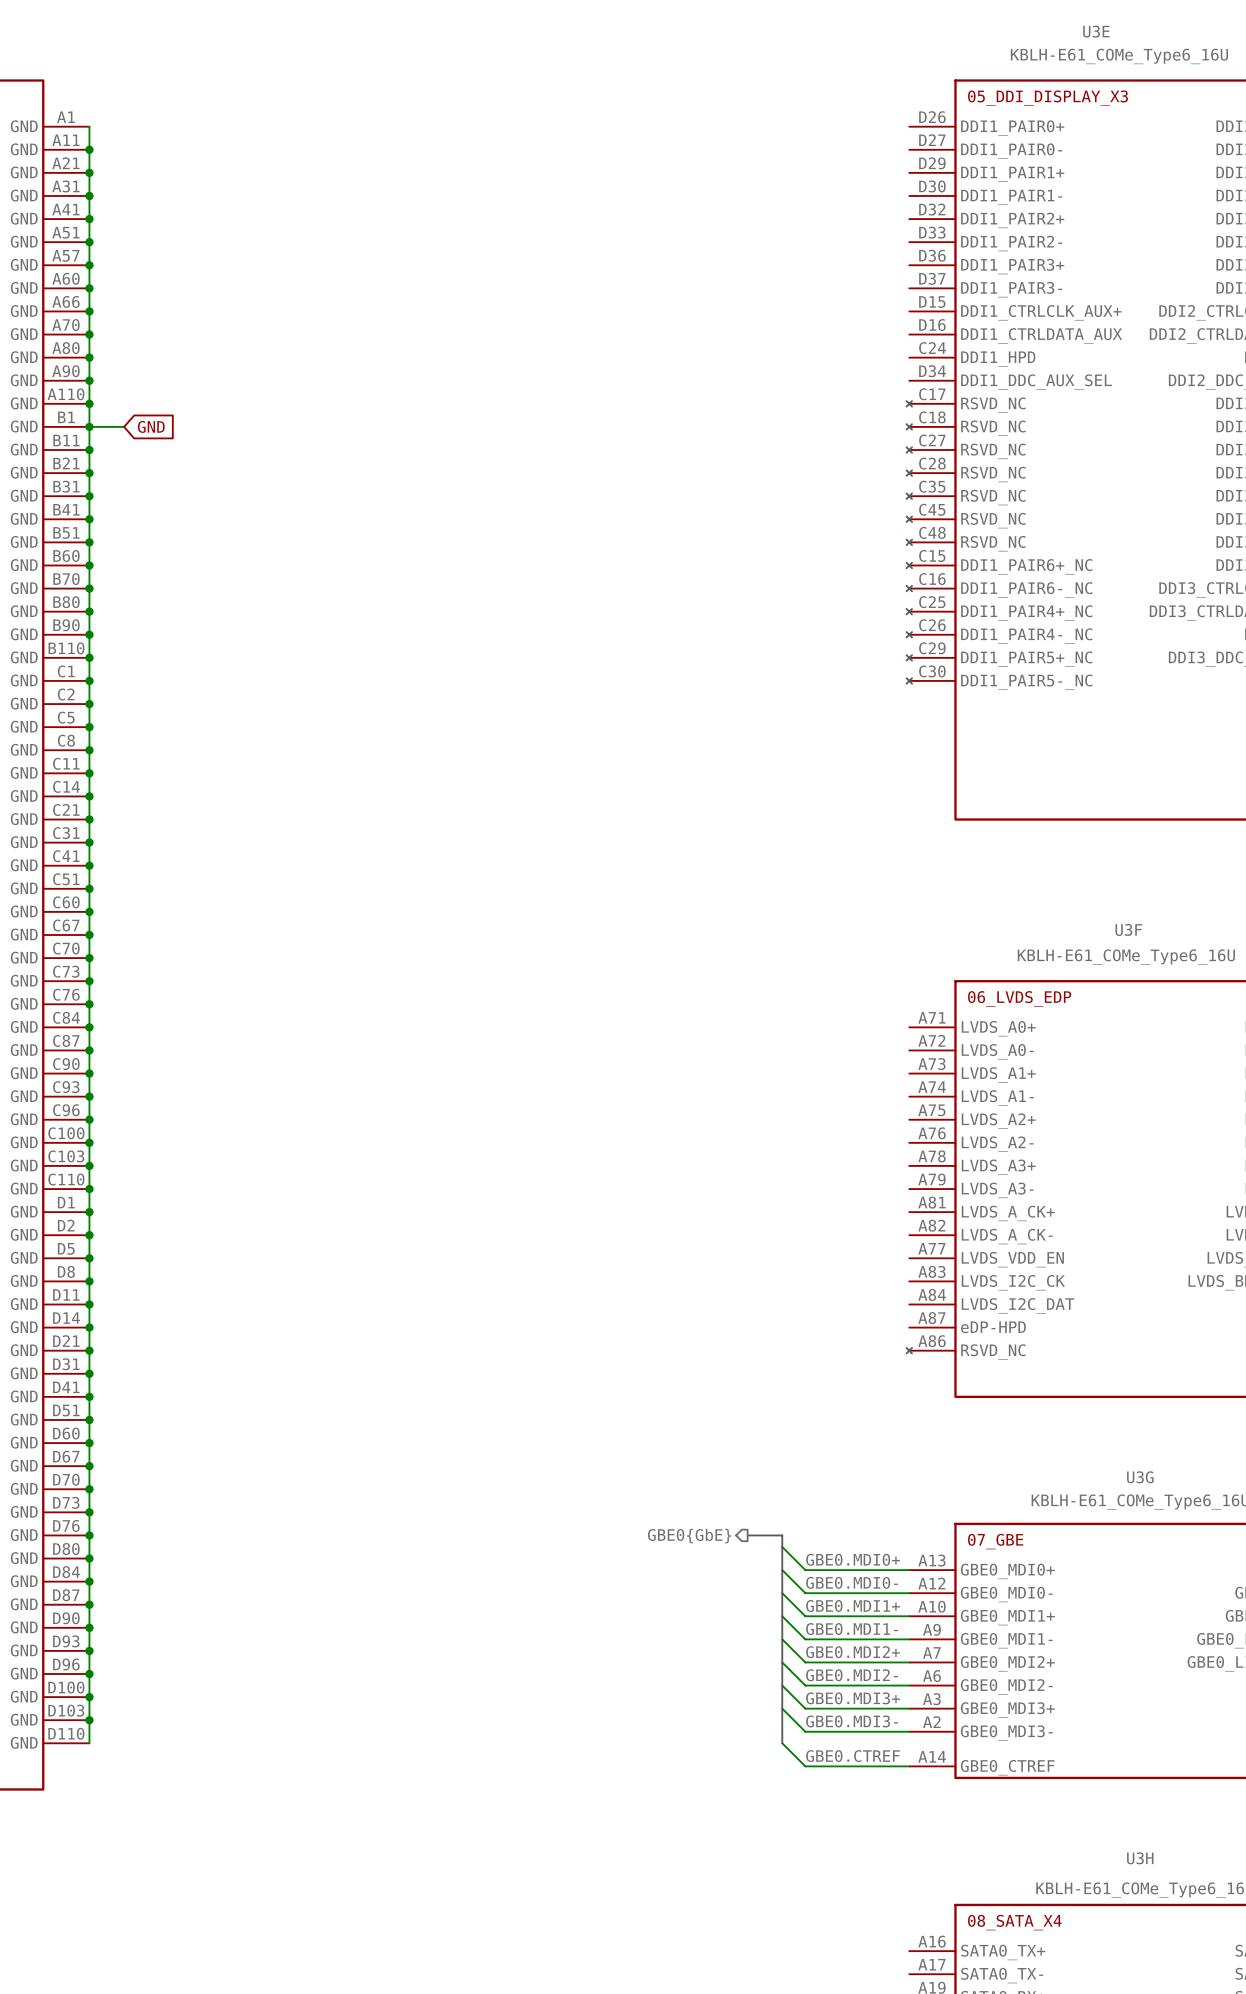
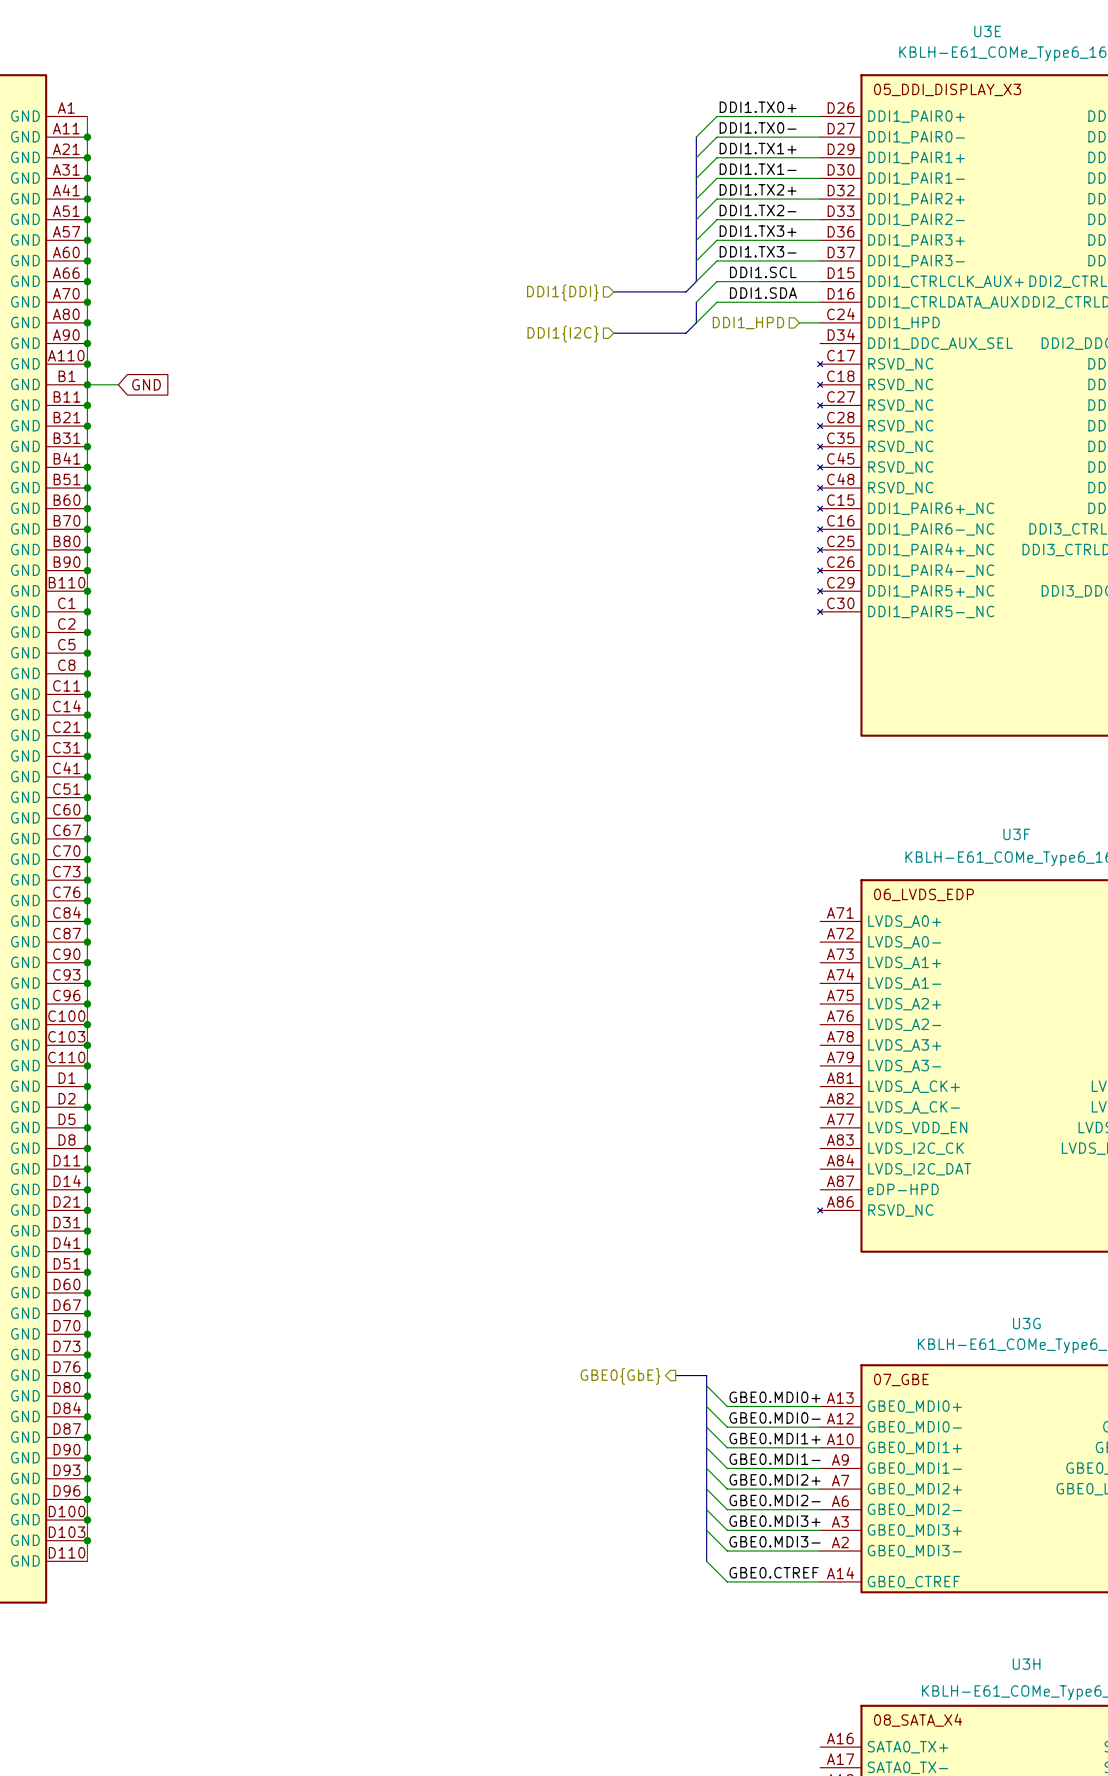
label: none -> DDI1.TX0+ (758, 107)
wire: none -> (820, 116) (716, 116) (696, 137)
label: none -> DDI1.TX0- (758, 127)
bus: none -> (696, 137) (696, 281) (686, 291) (613, 291)
wire: none -> (820, 137) (716, 137) (696, 157)
label: none -> DDI1.TX1+ (758, 148)
wire: none -> (820, 157) (716, 157) (696, 178)
label: none -> DDI1.TX1- (758, 169)
wire: none -> (820, 178) (716, 178) (696, 199)
label: none -> DDI1.TX2+ (758, 189)
wire: none -> (820, 199) (716, 199) (696, 219)
label: none -> DDI1.TX2- (758, 210)
wire: none -> (820, 219) (716, 219) (696, 240)
label: none -> DDI1.TX3+ (758, 231)
wire: none -> (820, 240) (716, 240) (696, 260)
label: none -> DDI1.TX3- (758, 251)
wire: none -> (820, 260) (716, 260) (696, 281)
label: none -> DDI1.SCL (763, 272)
wire: none -> (820, 281) (716, 281) (696, 302)
hierarchical label: none -> DDI1{DDI} (562, 292)
label: none -> DDI1.SDA (763, 293)
bus: none -> (696, 302) (696, 322) (686, 333) (613, 333)
wire: none -> (820, 302) (716, 302) (696, 322)
wire: none -> (799, 322) (820, 322)
hierarchical label: none -> DDI1_HPD (748, 322)
hierarchical label: none -> DDI1{I2C} (562, 334)

